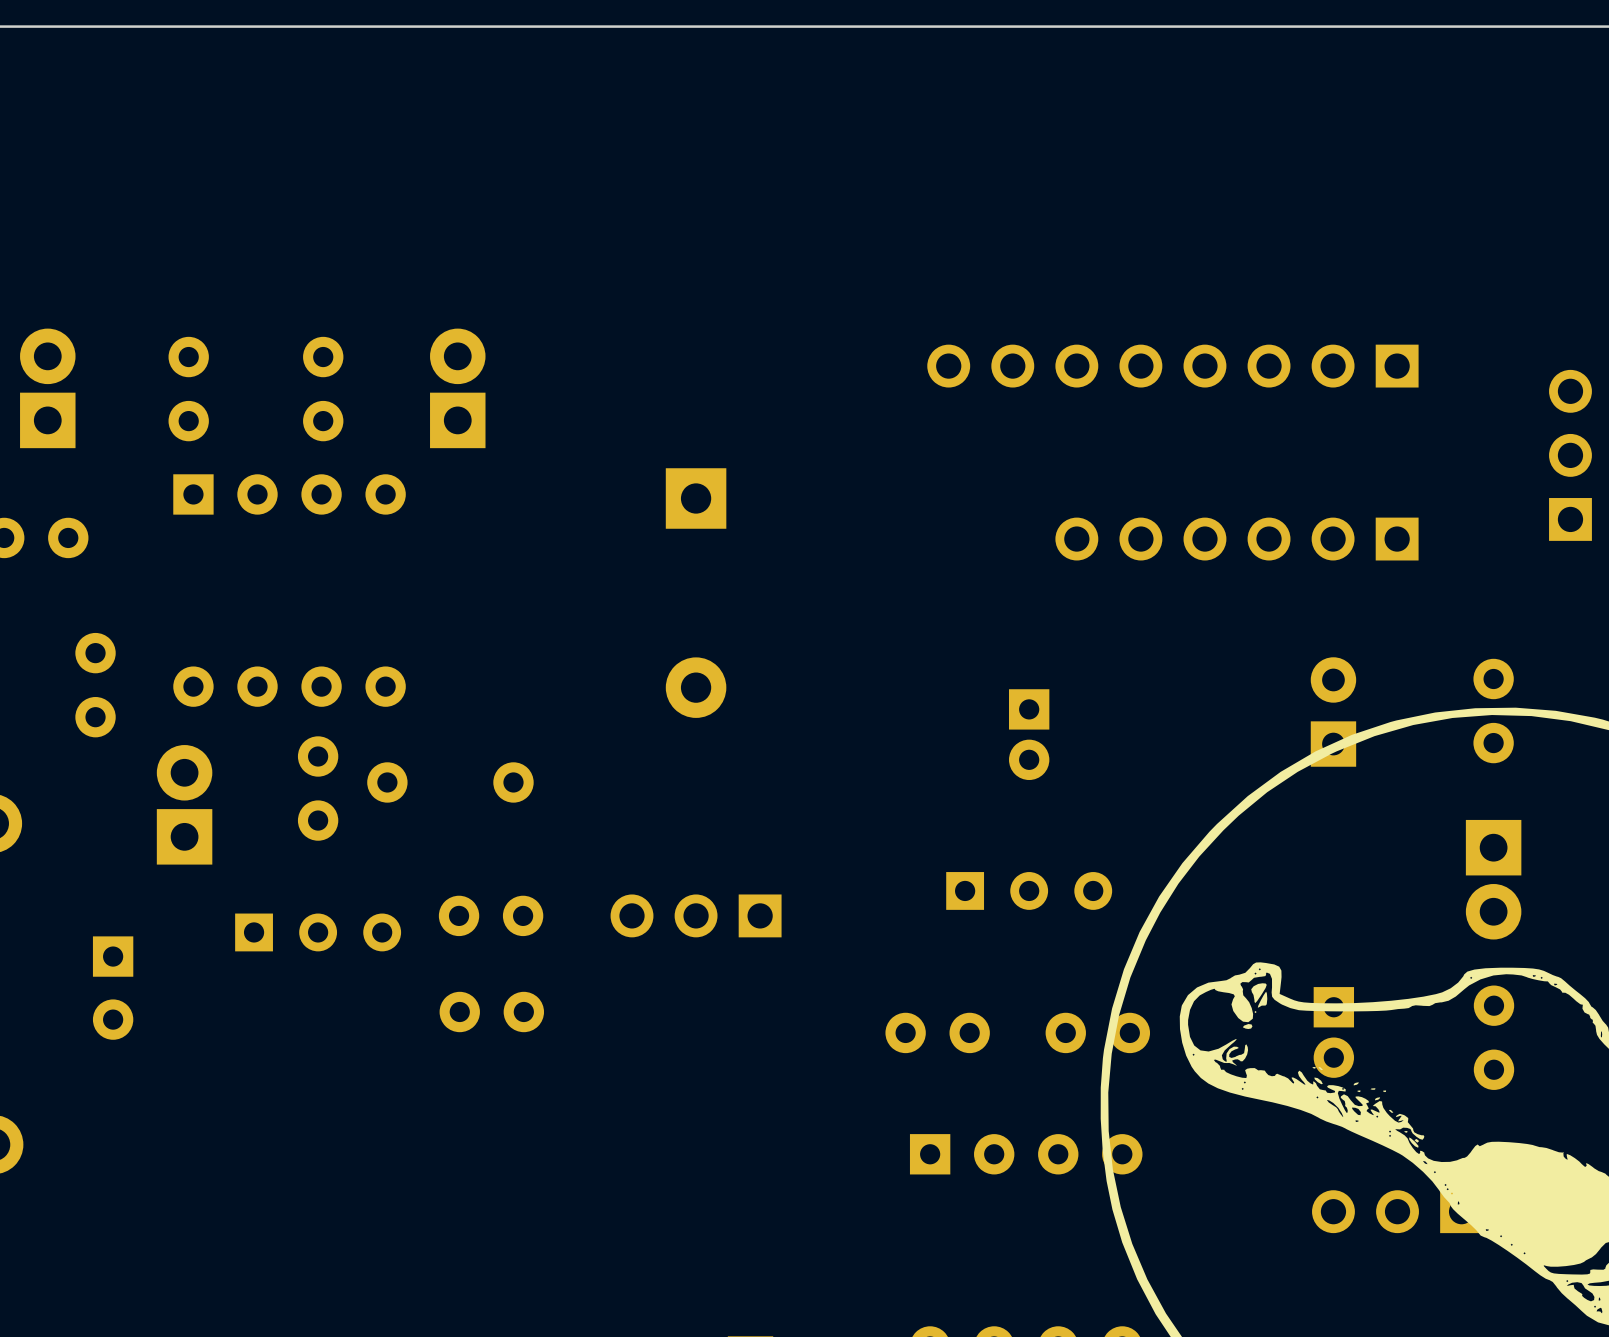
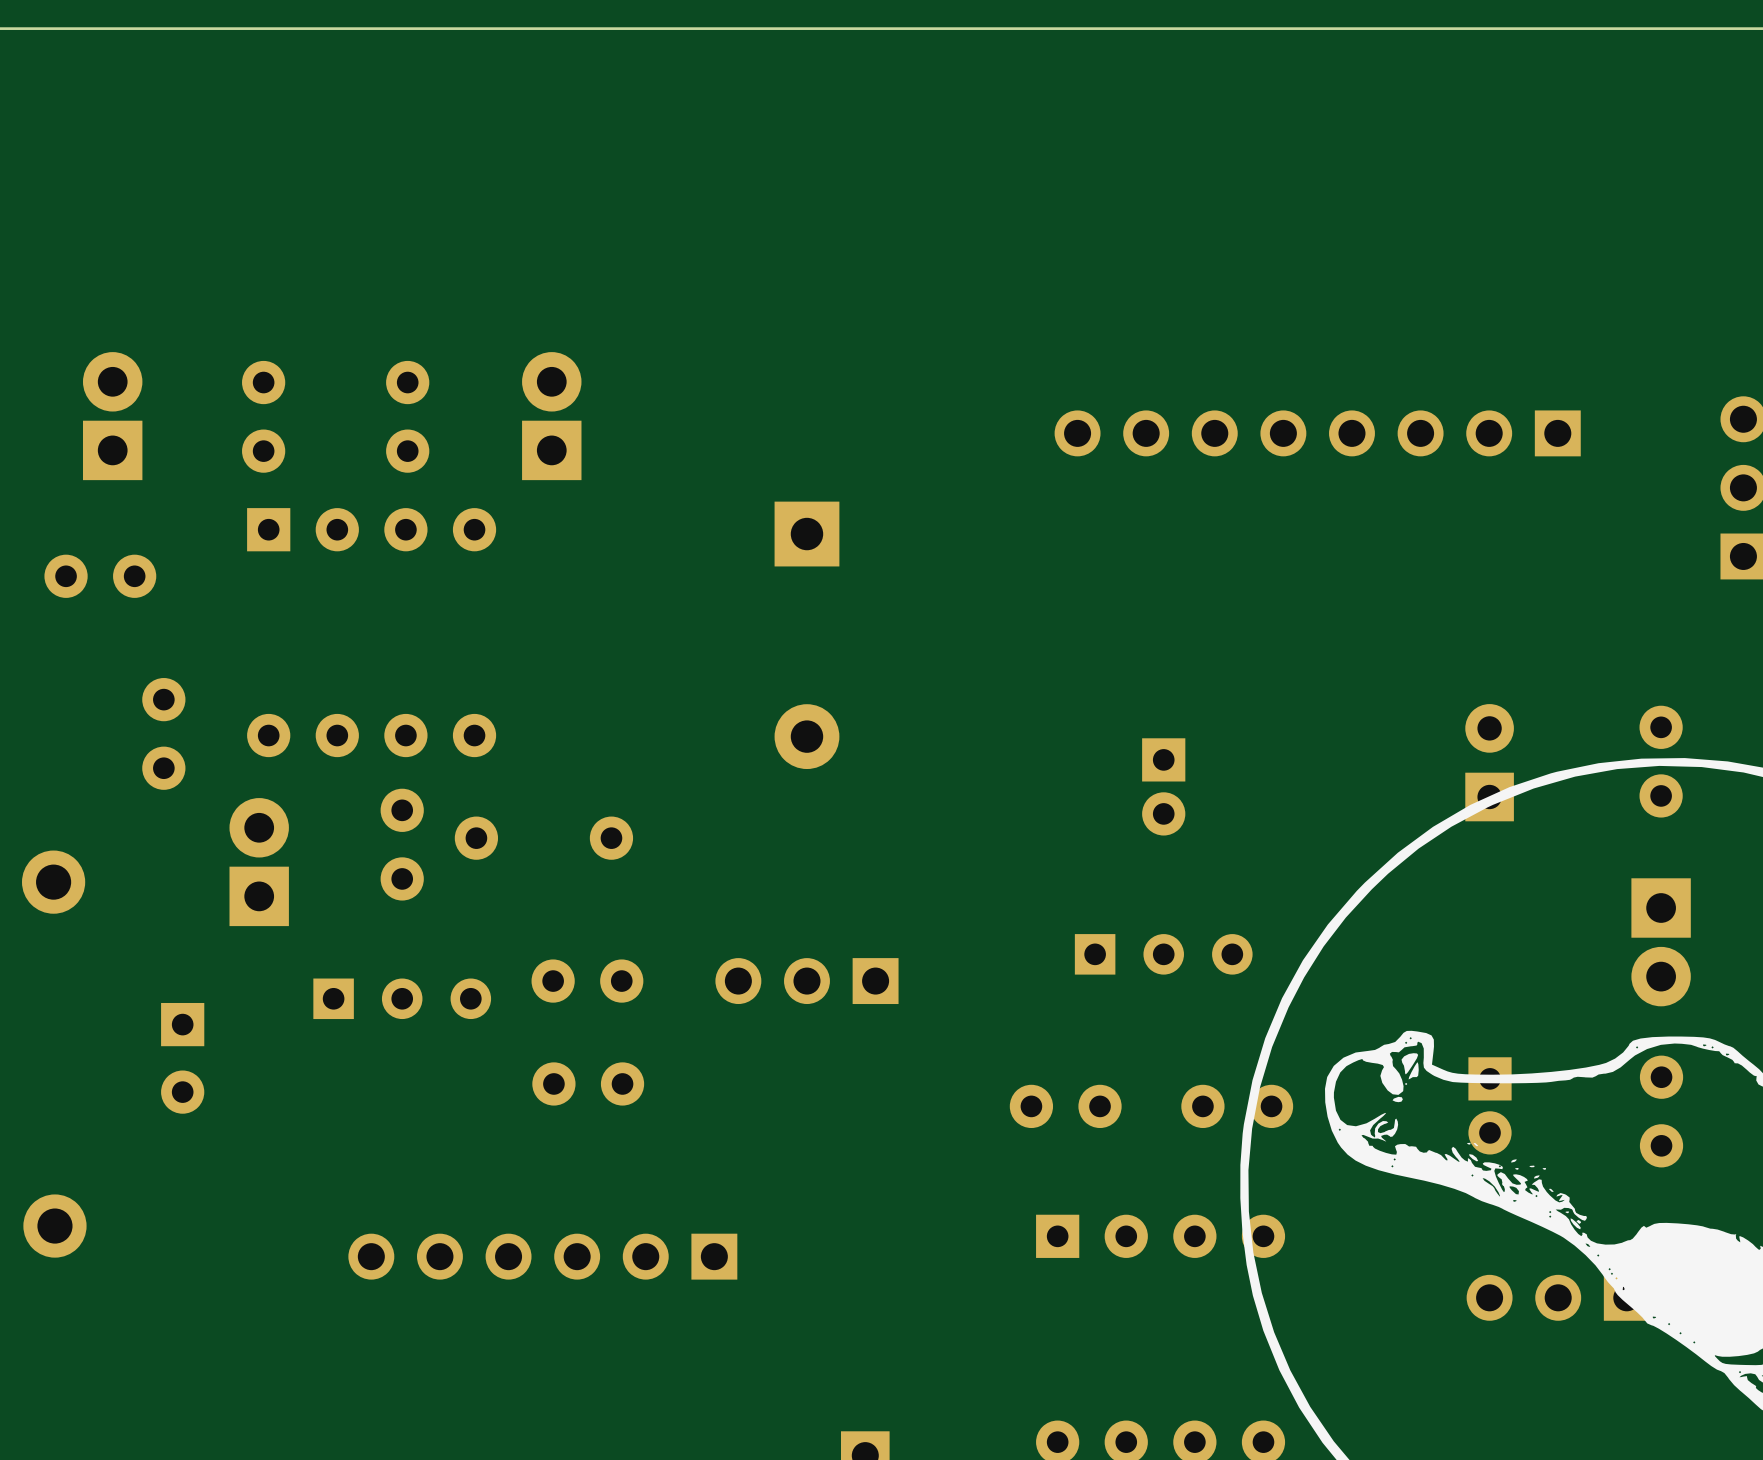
part position: (1172, 366) -> (1317, 433)
part: (1236, 539) -> none
part: none -> (542, 1256)

